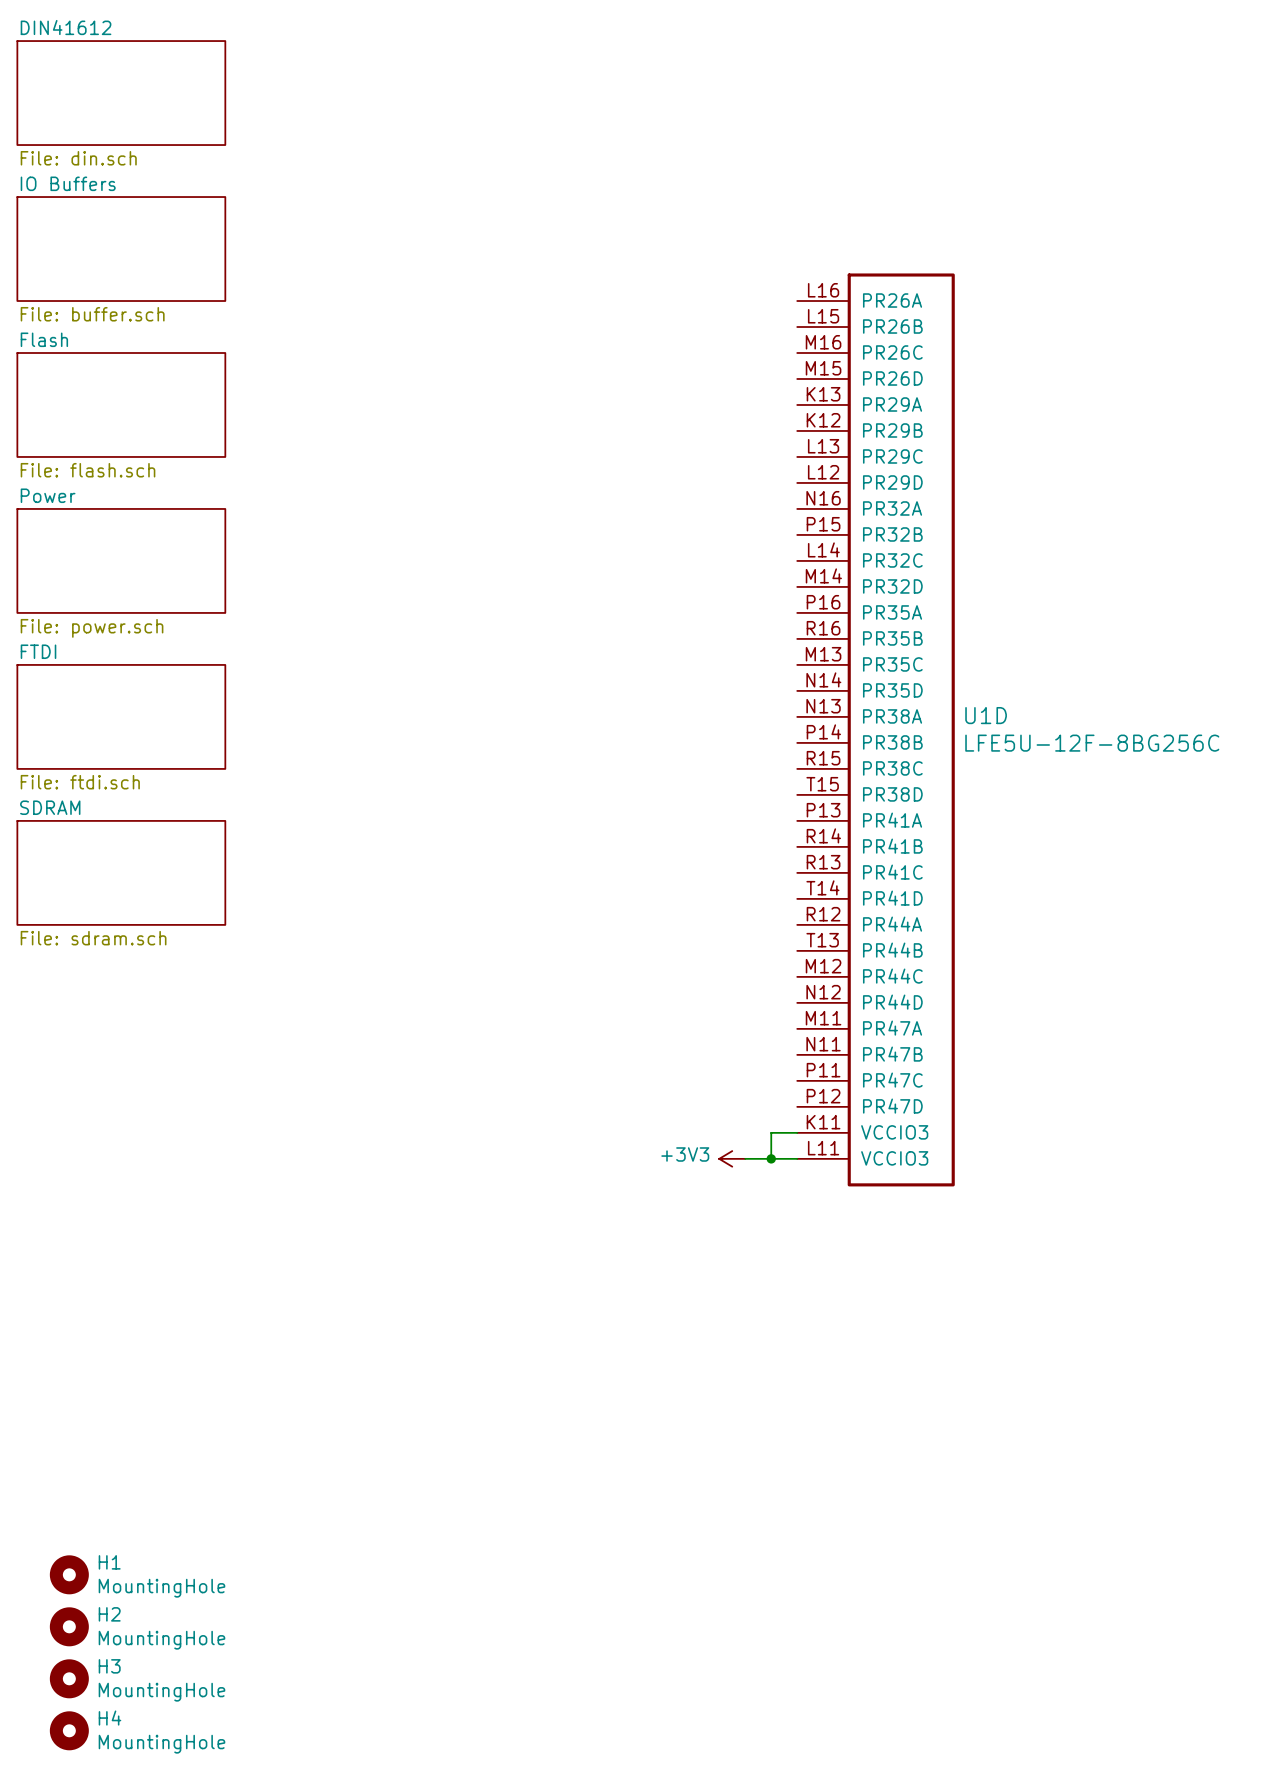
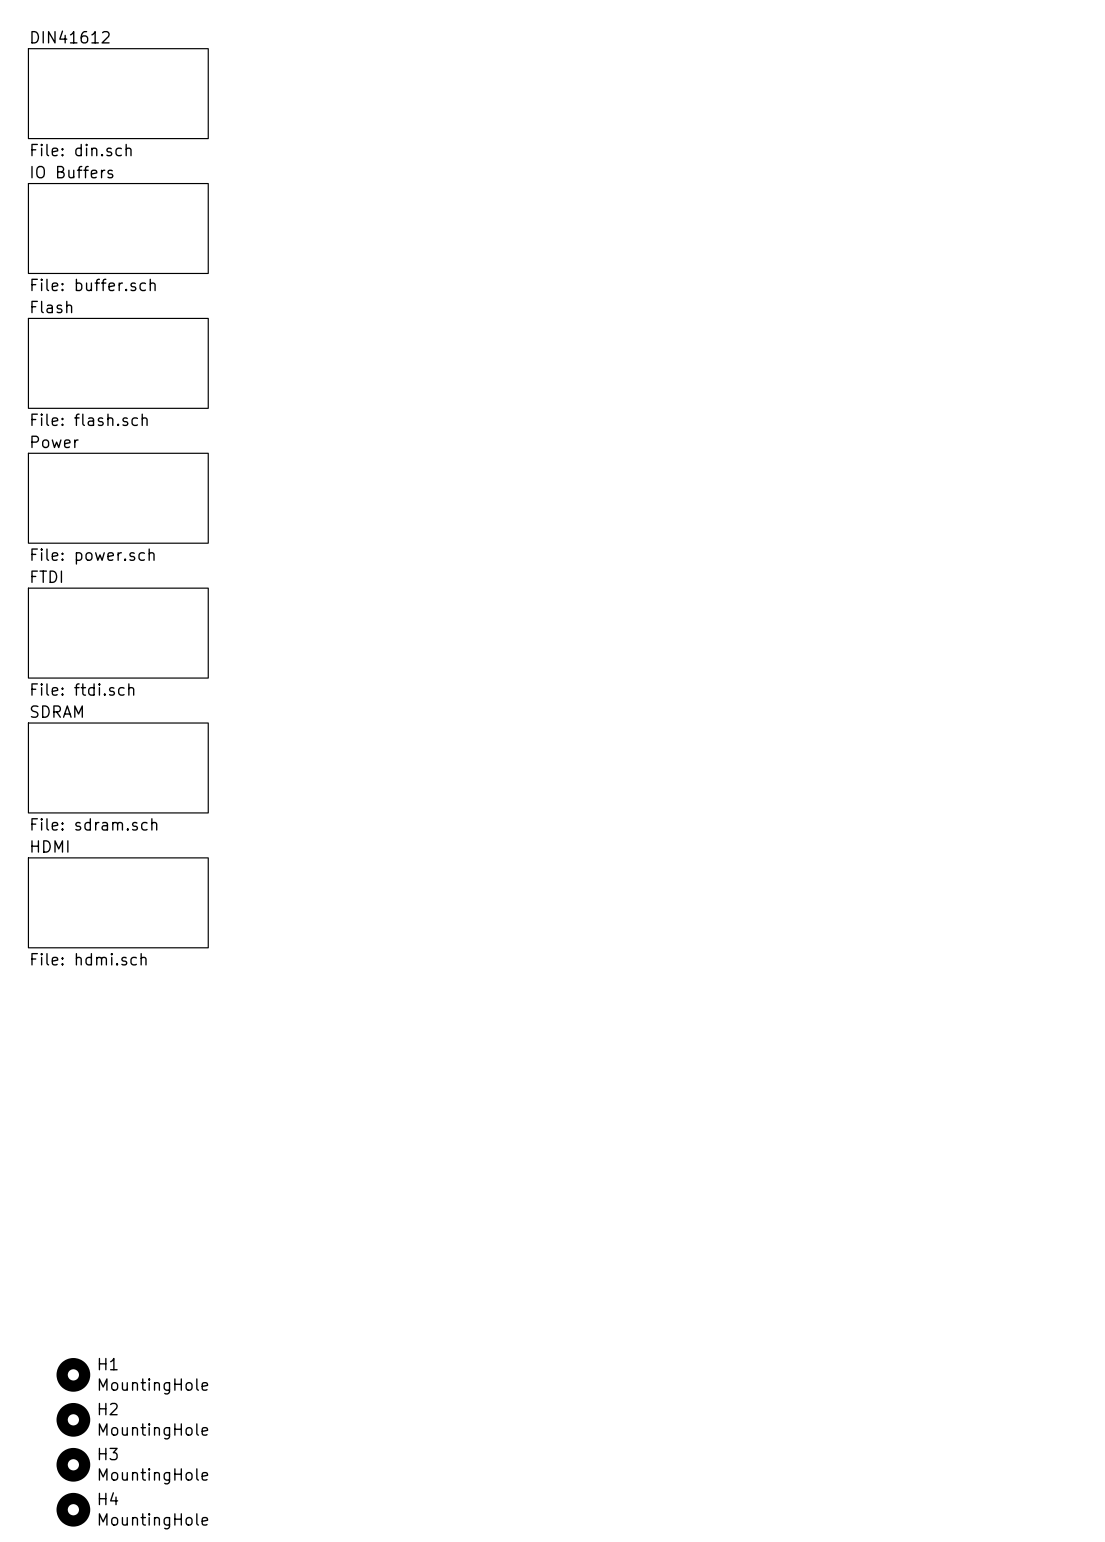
U1D: LFE5U-12F-8BG256C (876, 729) -> none
sheet HDMI: none -> File: hdmi.sch (118, 902)
wire: (797, 1132) (771, 1132) (771, 1158) -> none
power symbol: +3V3 (732, 1158) -> none
wire: (745, 1158) (797, 1158) -> none
junction: (771, 1158) -> none

